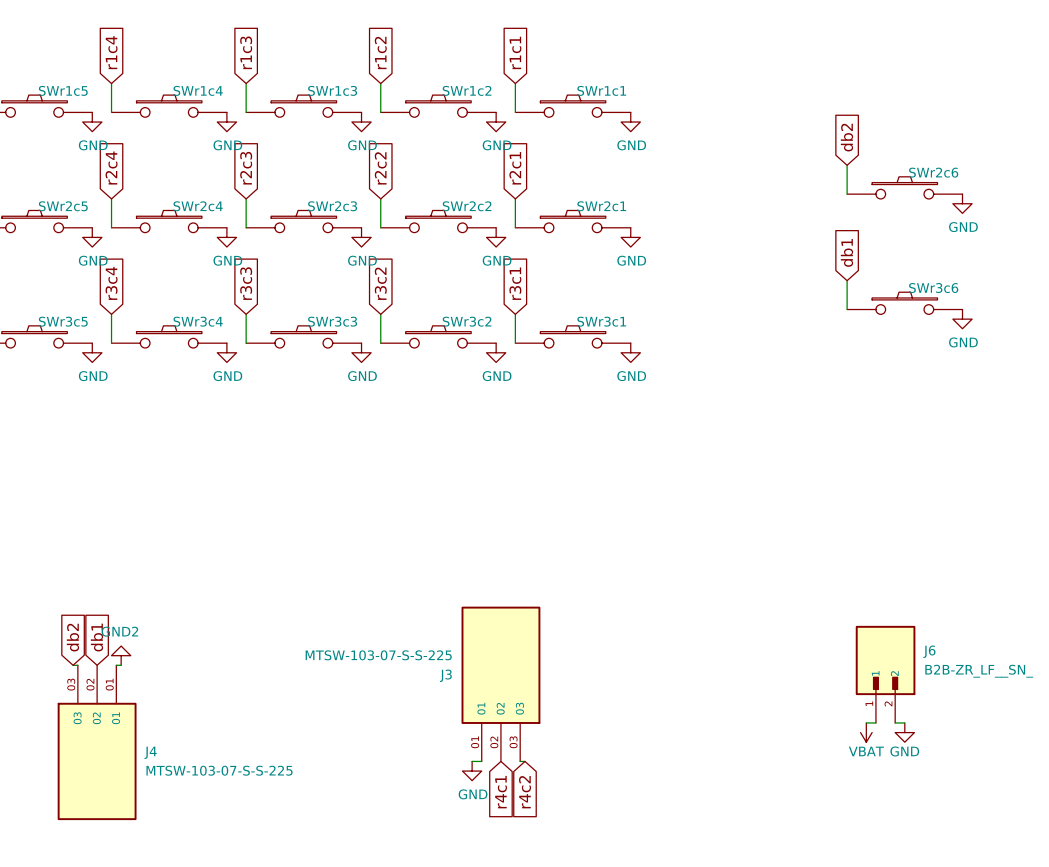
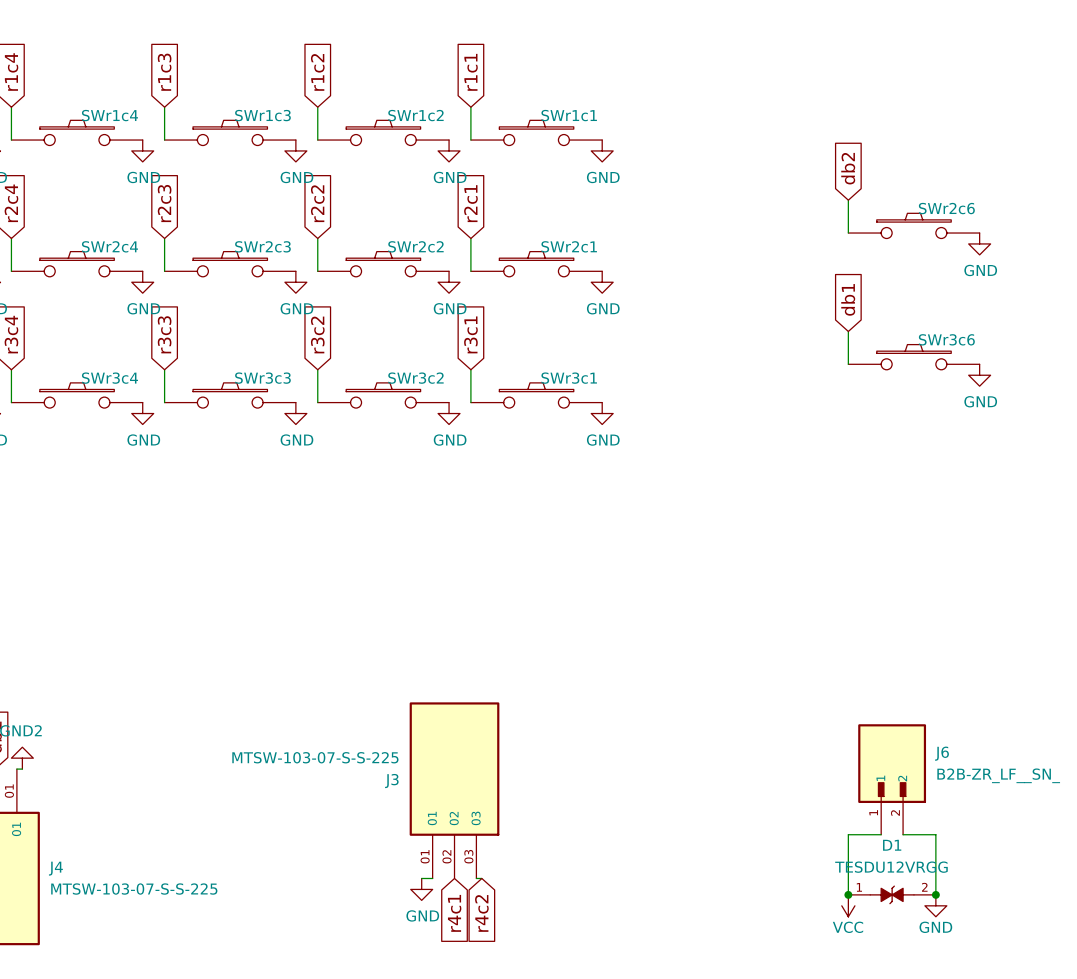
wire: none -> (870, 834) (848, 834) (848, 894)
wire: none -> (914, 834) (935, 834) (935, 894)
power symbol: VBAT (866, 732) -> none
power symbol position: GND (904, 732) -> GND (935, 905)
junction: none -> (848, 894)
D1: none -> TESDU12VRGG (892, 894)
junction: none -> (935, 894)
power symbol: none -> VCC (848, 905)

